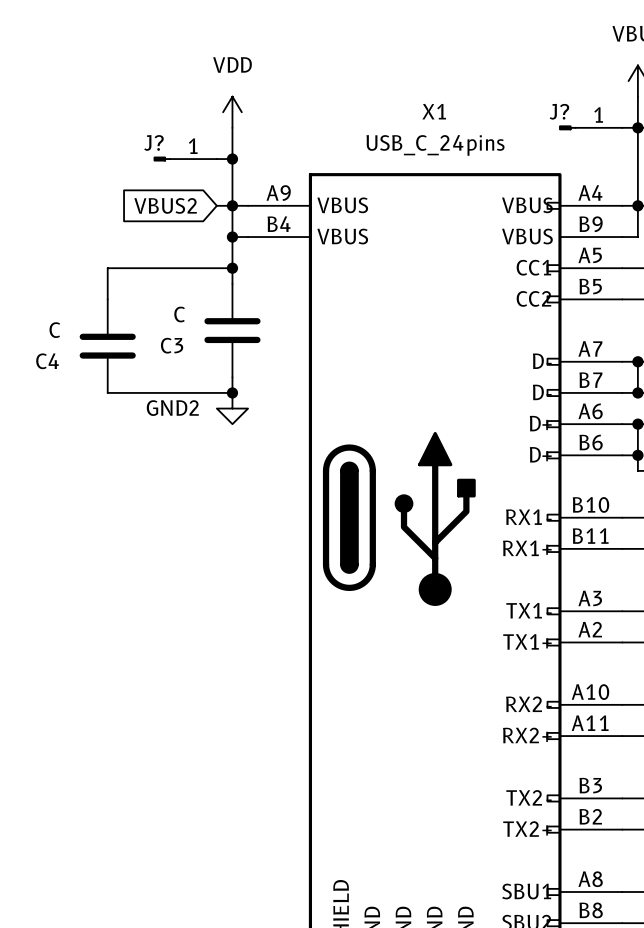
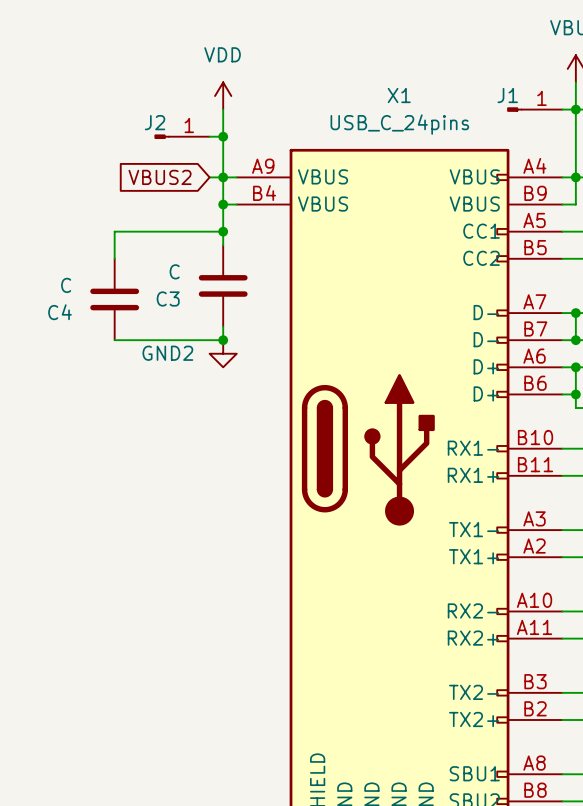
J? name: J? (559, 111) -> J1 (507, 95)
J? name: J? (153, 142) -> J2 (155, 122)

